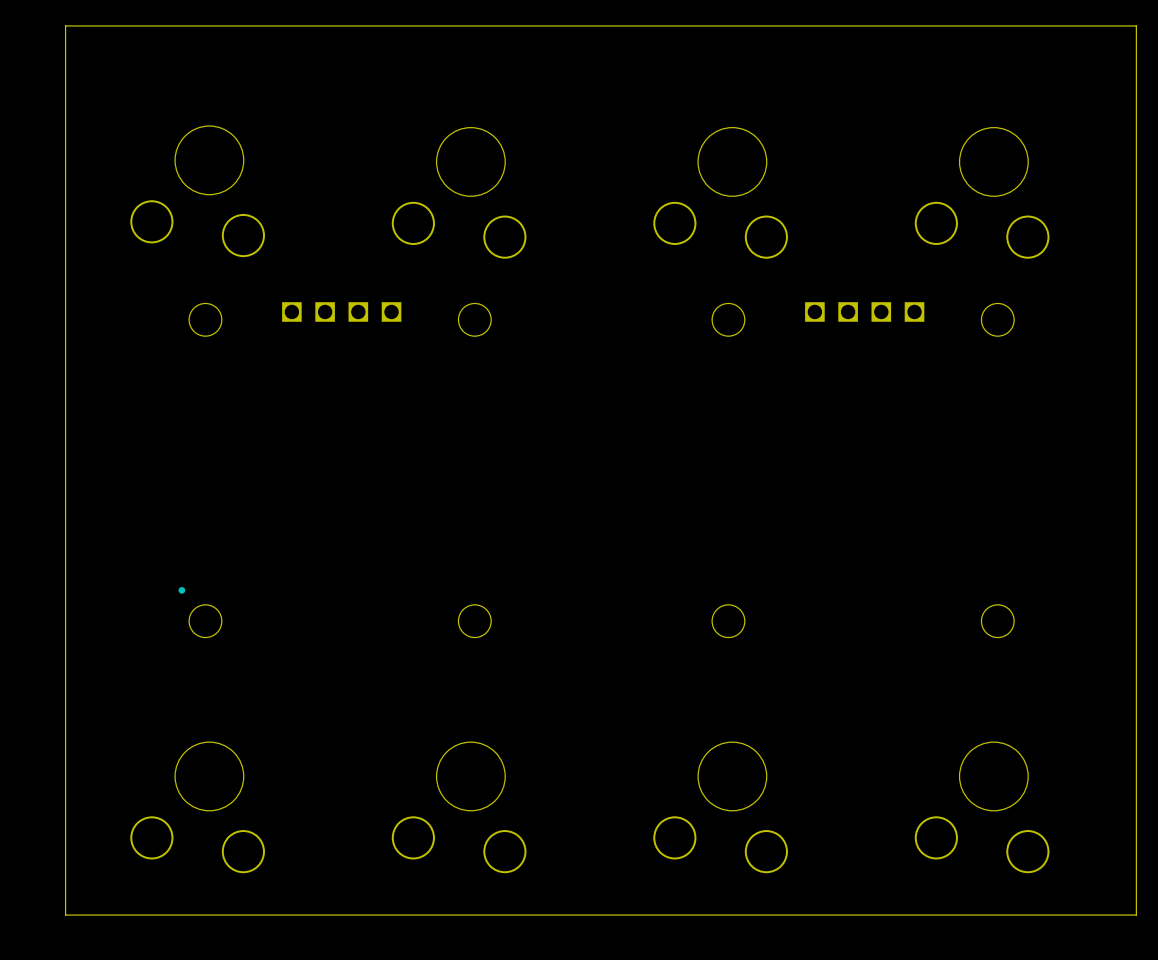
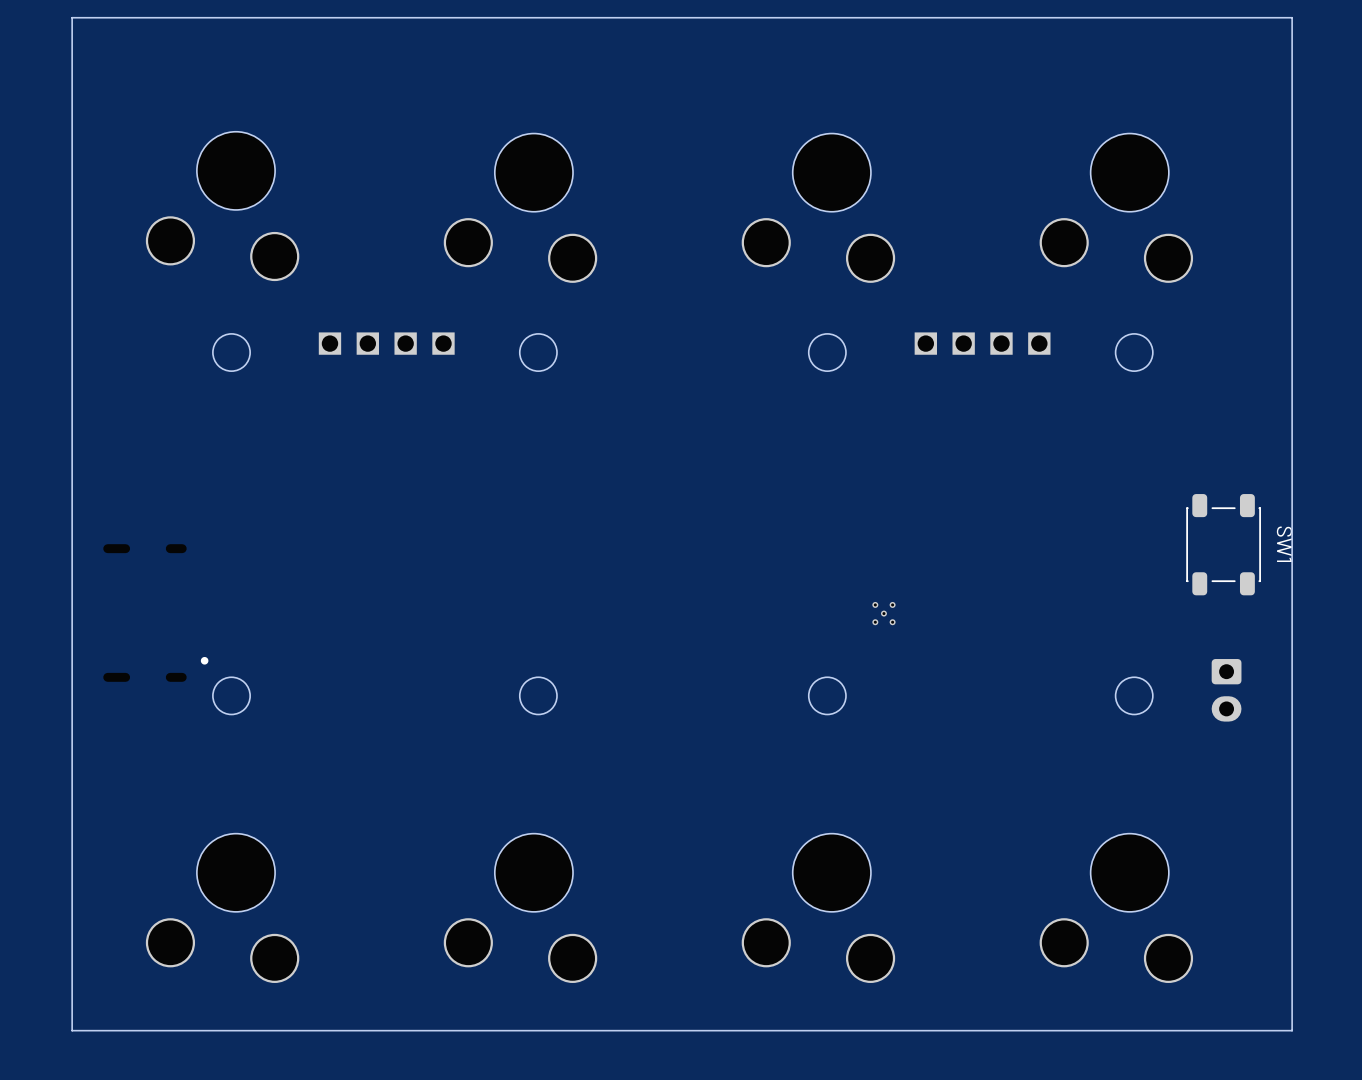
SW1: none -> (1223, 544)
part: none -> (883, 613)
part: none -> (1226, 690)

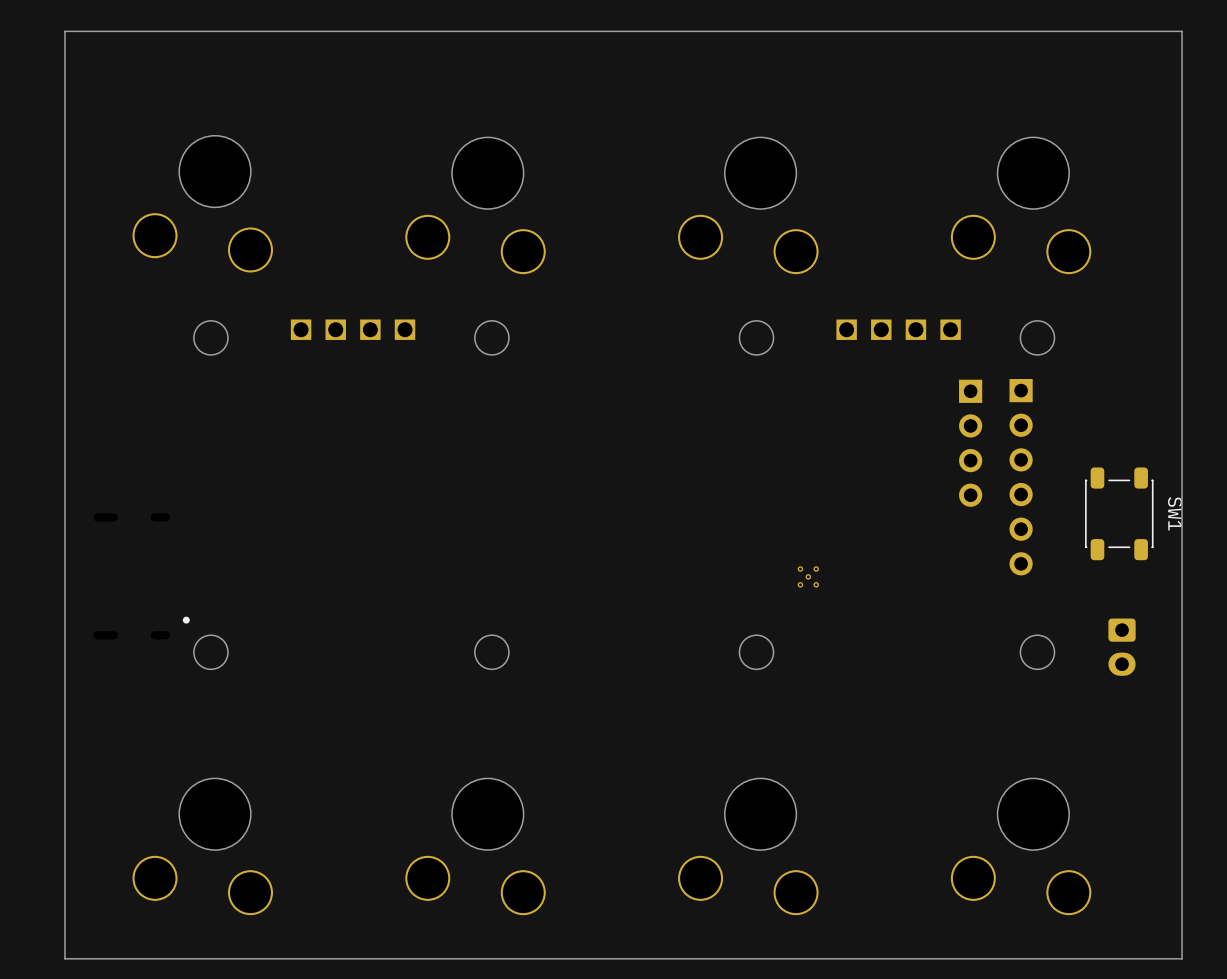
part: none -> (970, 443)
part: none -> (1021, 477)

